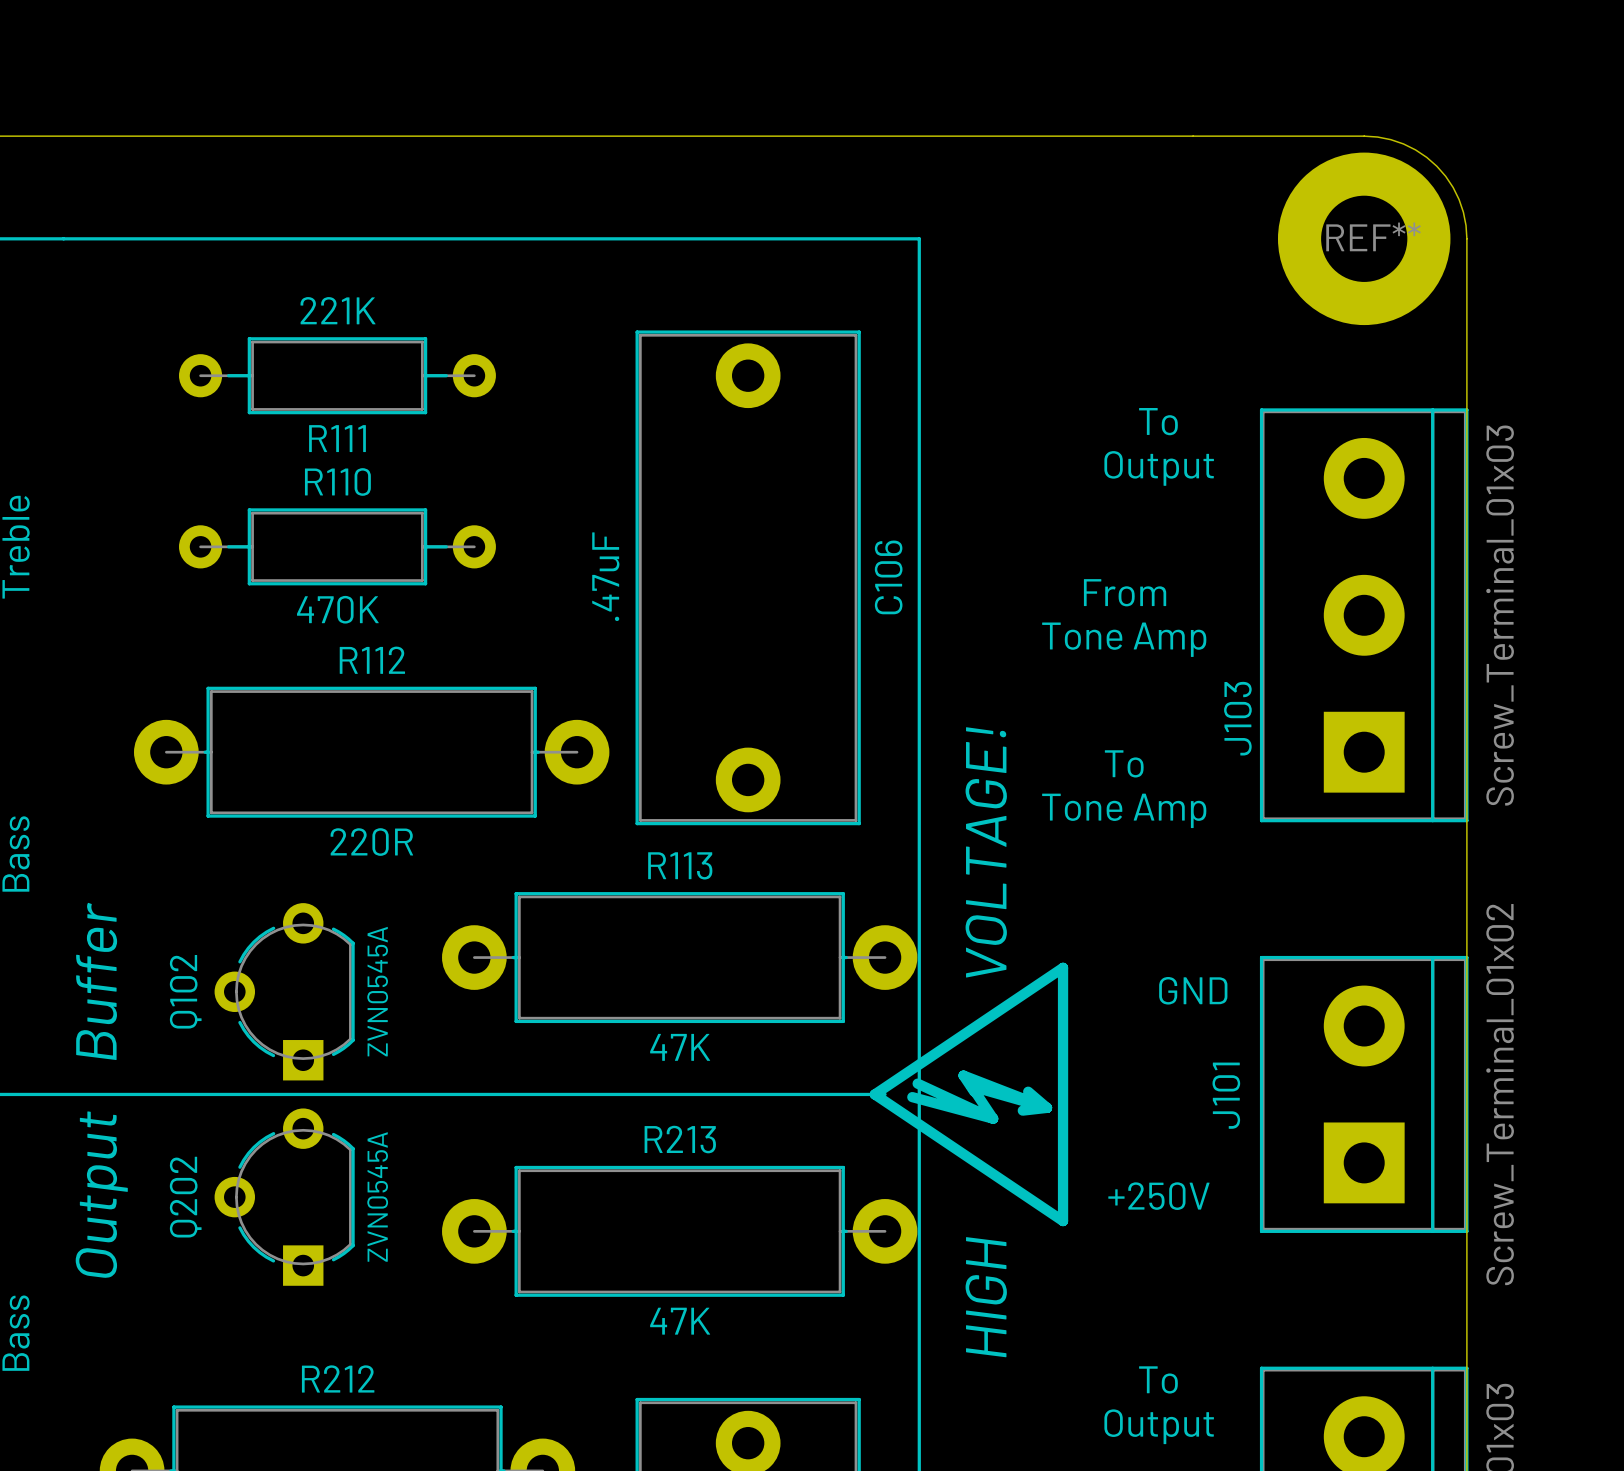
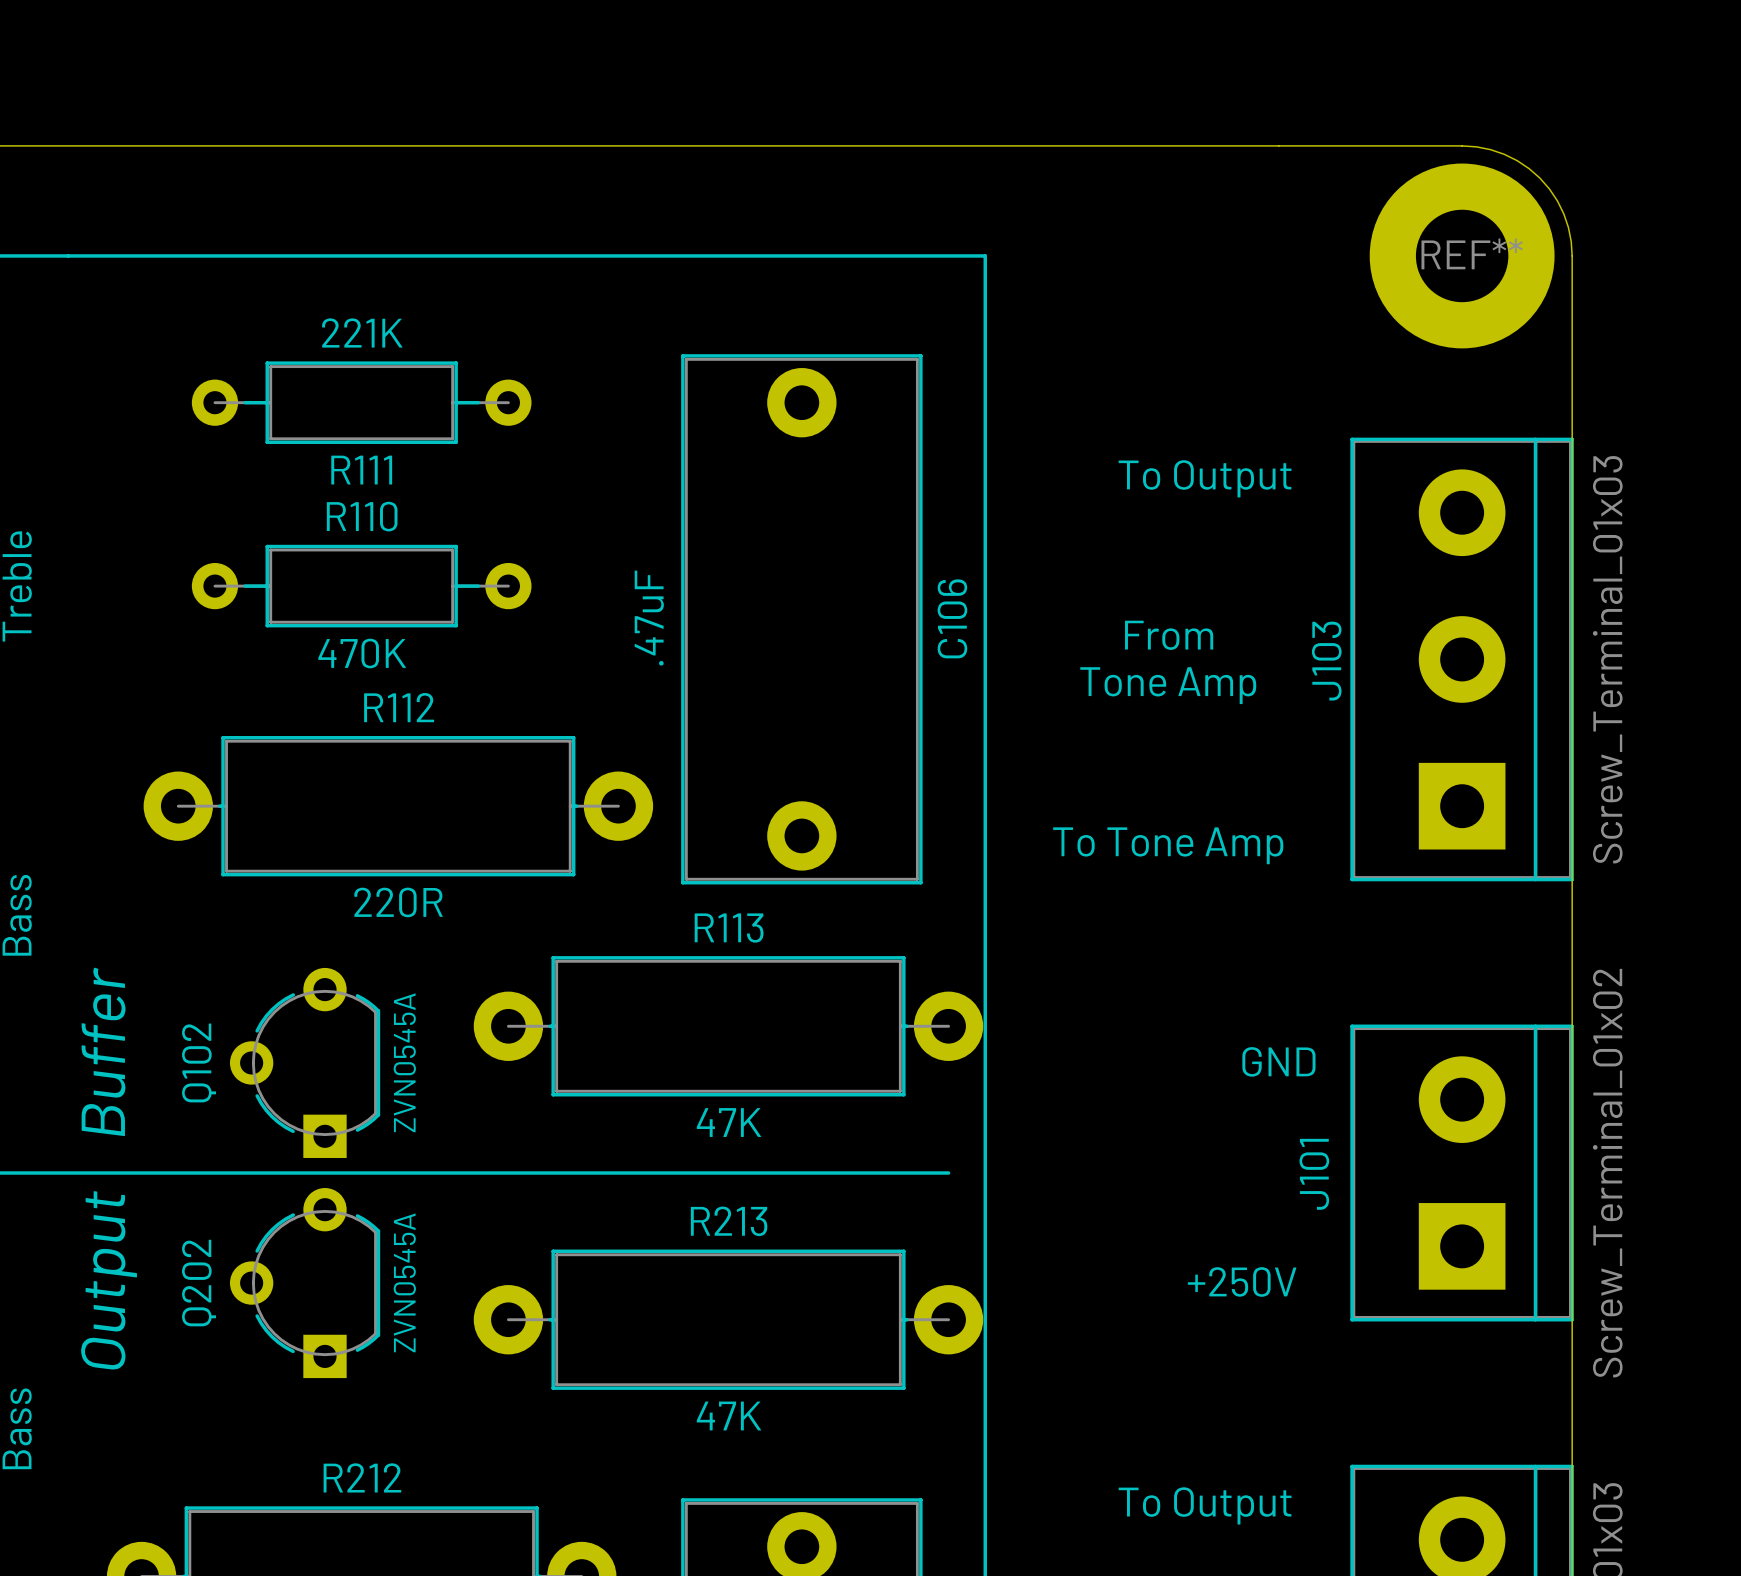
text: To (1158, 421) -> none
text: Output (1159, 468) -> To Output (1205, 478)
text position: From (1125, 592) -> From (1169, 635)
text position: Tone Amp (1124, 639) -> Tone Amp (1168, 685)
J103 name position: J103 (1237, 718) -> J103 (1326, 661)
text: To (1124, 763) -> none
text: Tone Amp (1124, 810) -> To Tone Amp (1168, 845)
text: VOLTAGE! (986, 852) -> none
drawing: [869, 962, 1069, 1227] -> none
text: HIGH (986, 1297) -> none
text: To (1158, 1379) -> none
text: Output (1159, 1426) -> To Output (1205, 1505)

